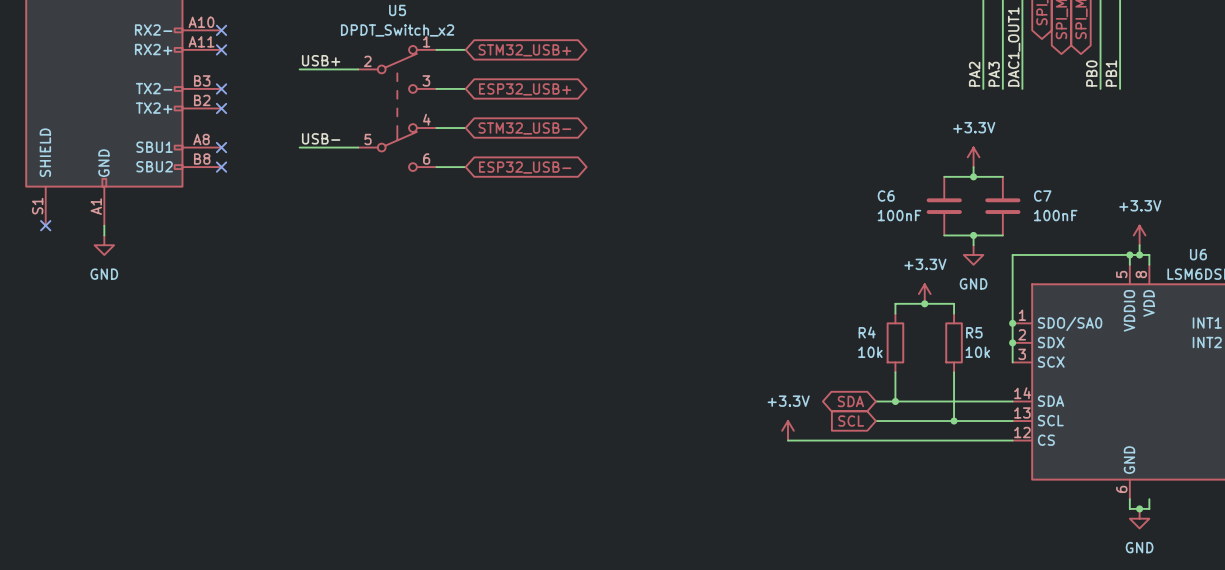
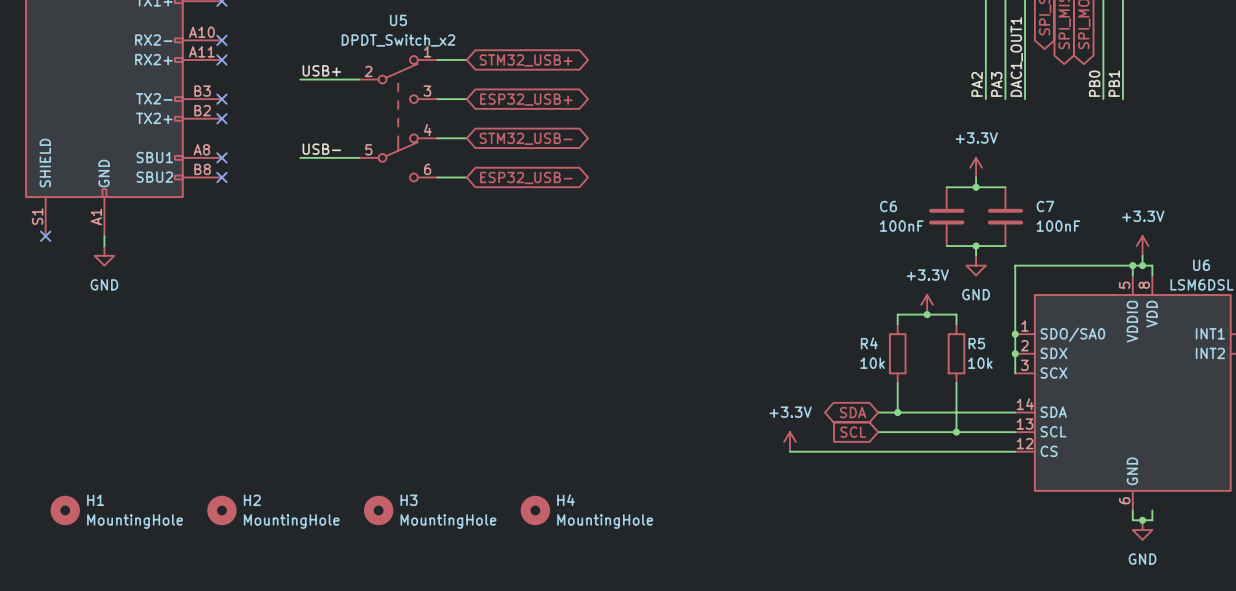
H1: none -> MountingHole (65, 510)
H2: none -> MountingHole (221, 510)
H3: none -> MountingHole (378, 510)
H4: none -> MountingHole (535, 510)

